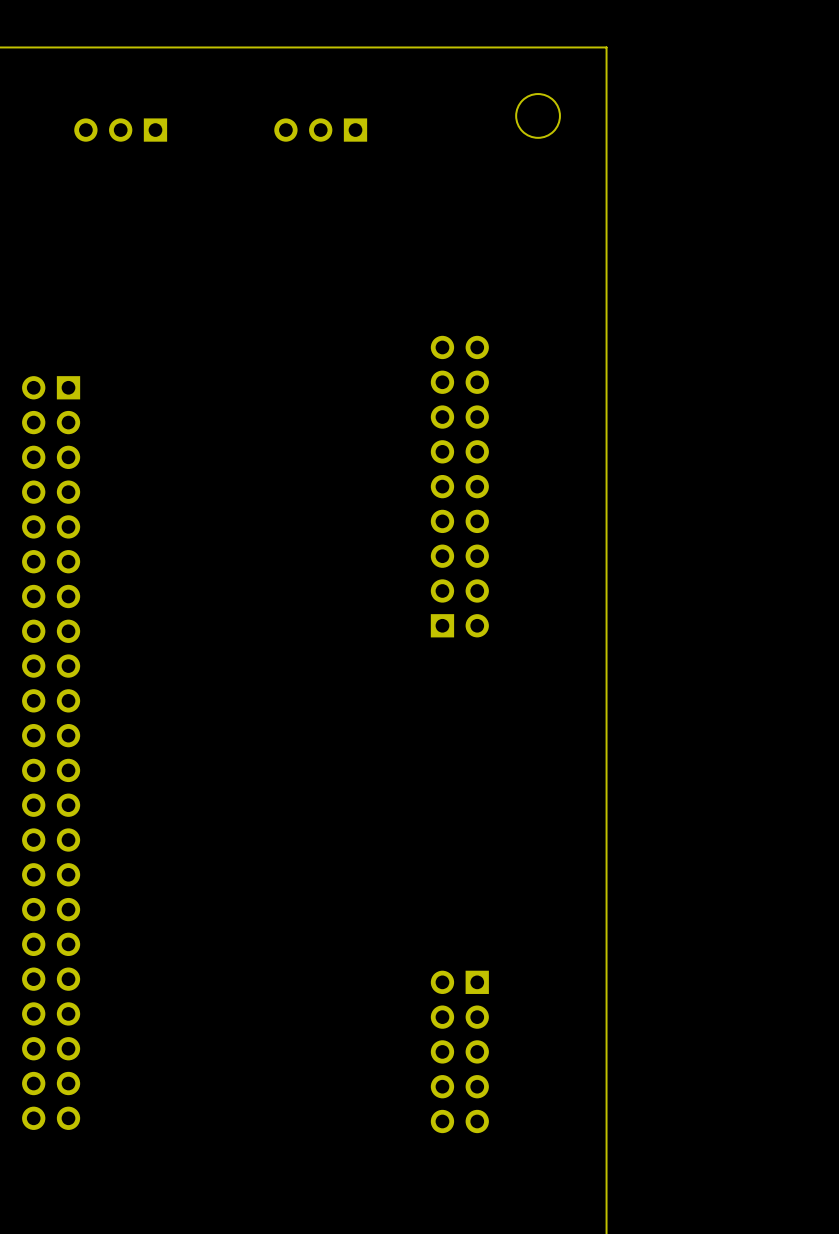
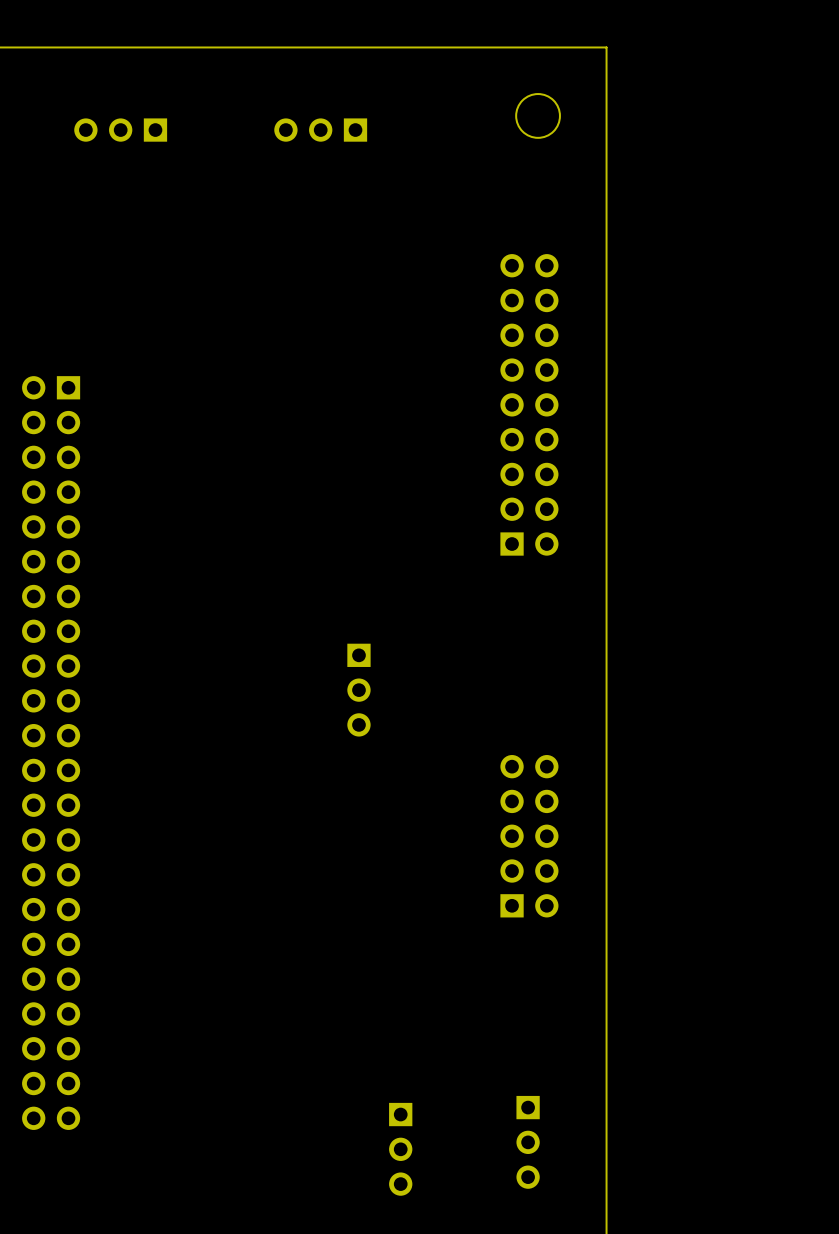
part position: (459, 486) -> (529, 404)
part: none -> (358, 690)
part rotation: 0° (459, 1051) -> 180° (529, 836)
part position: (459, 1051) -> (529, 836)
part: none -> (528, 1142)
part: none -> (400, 1149)

